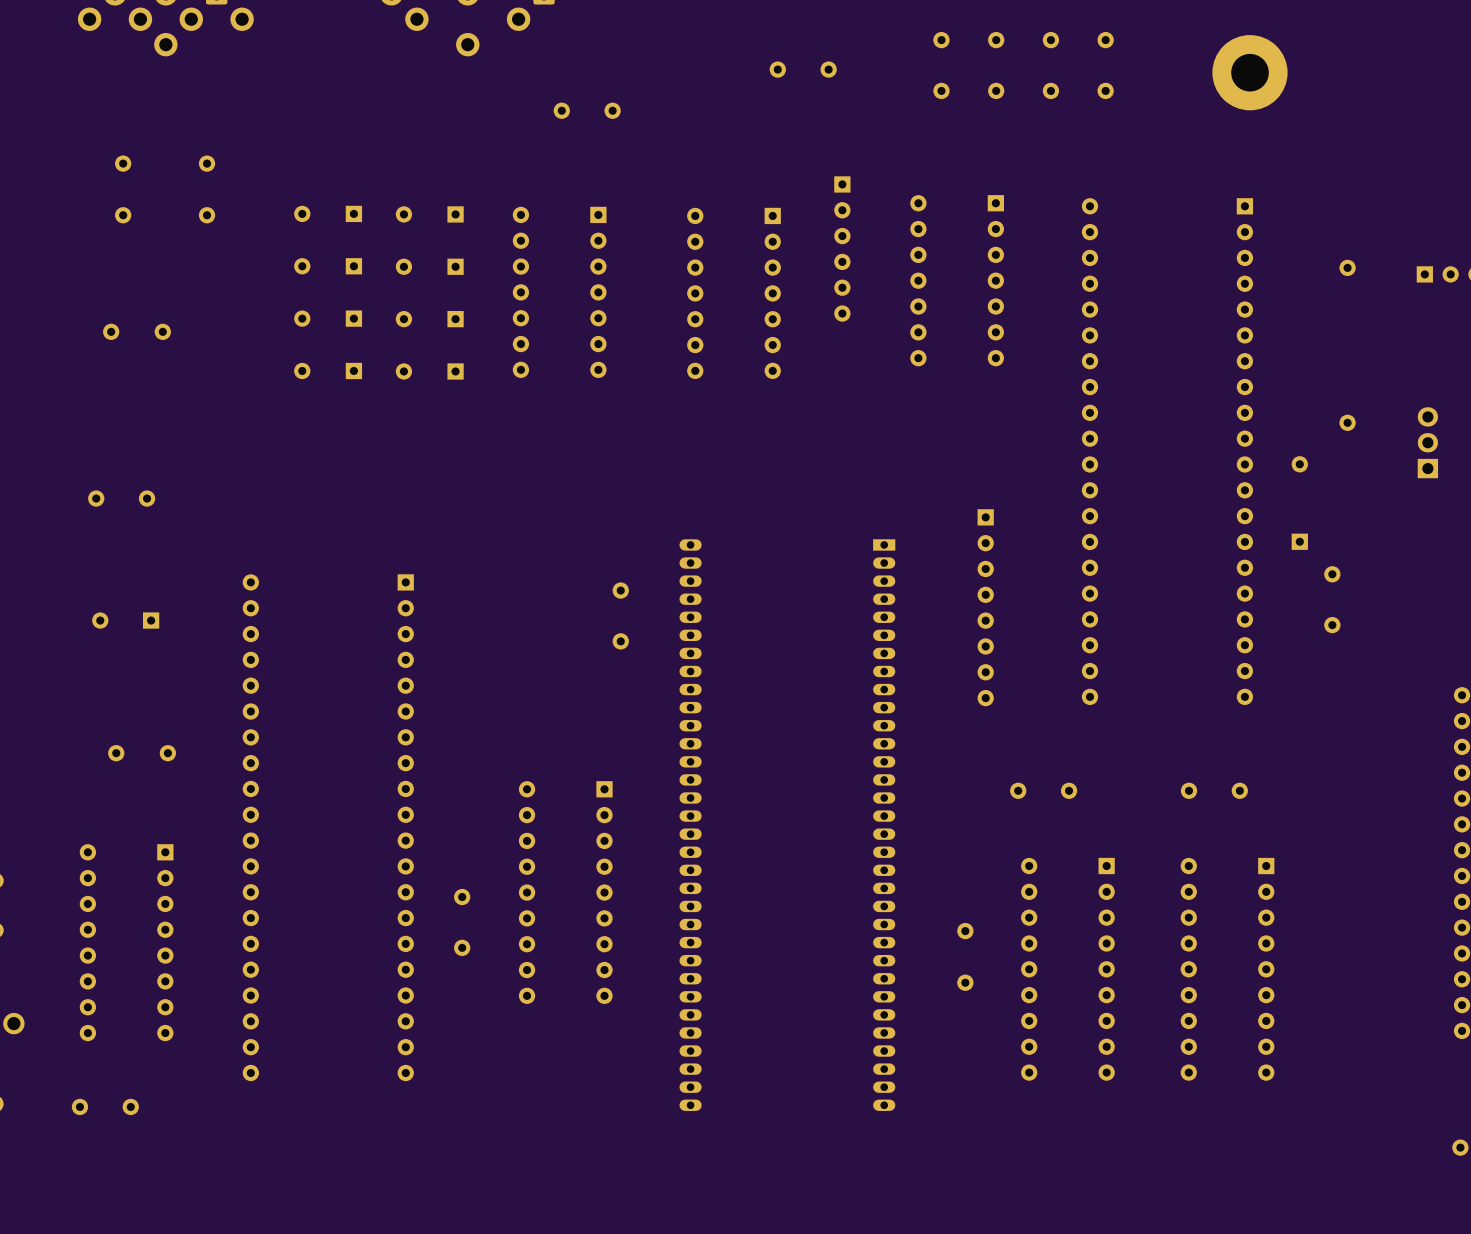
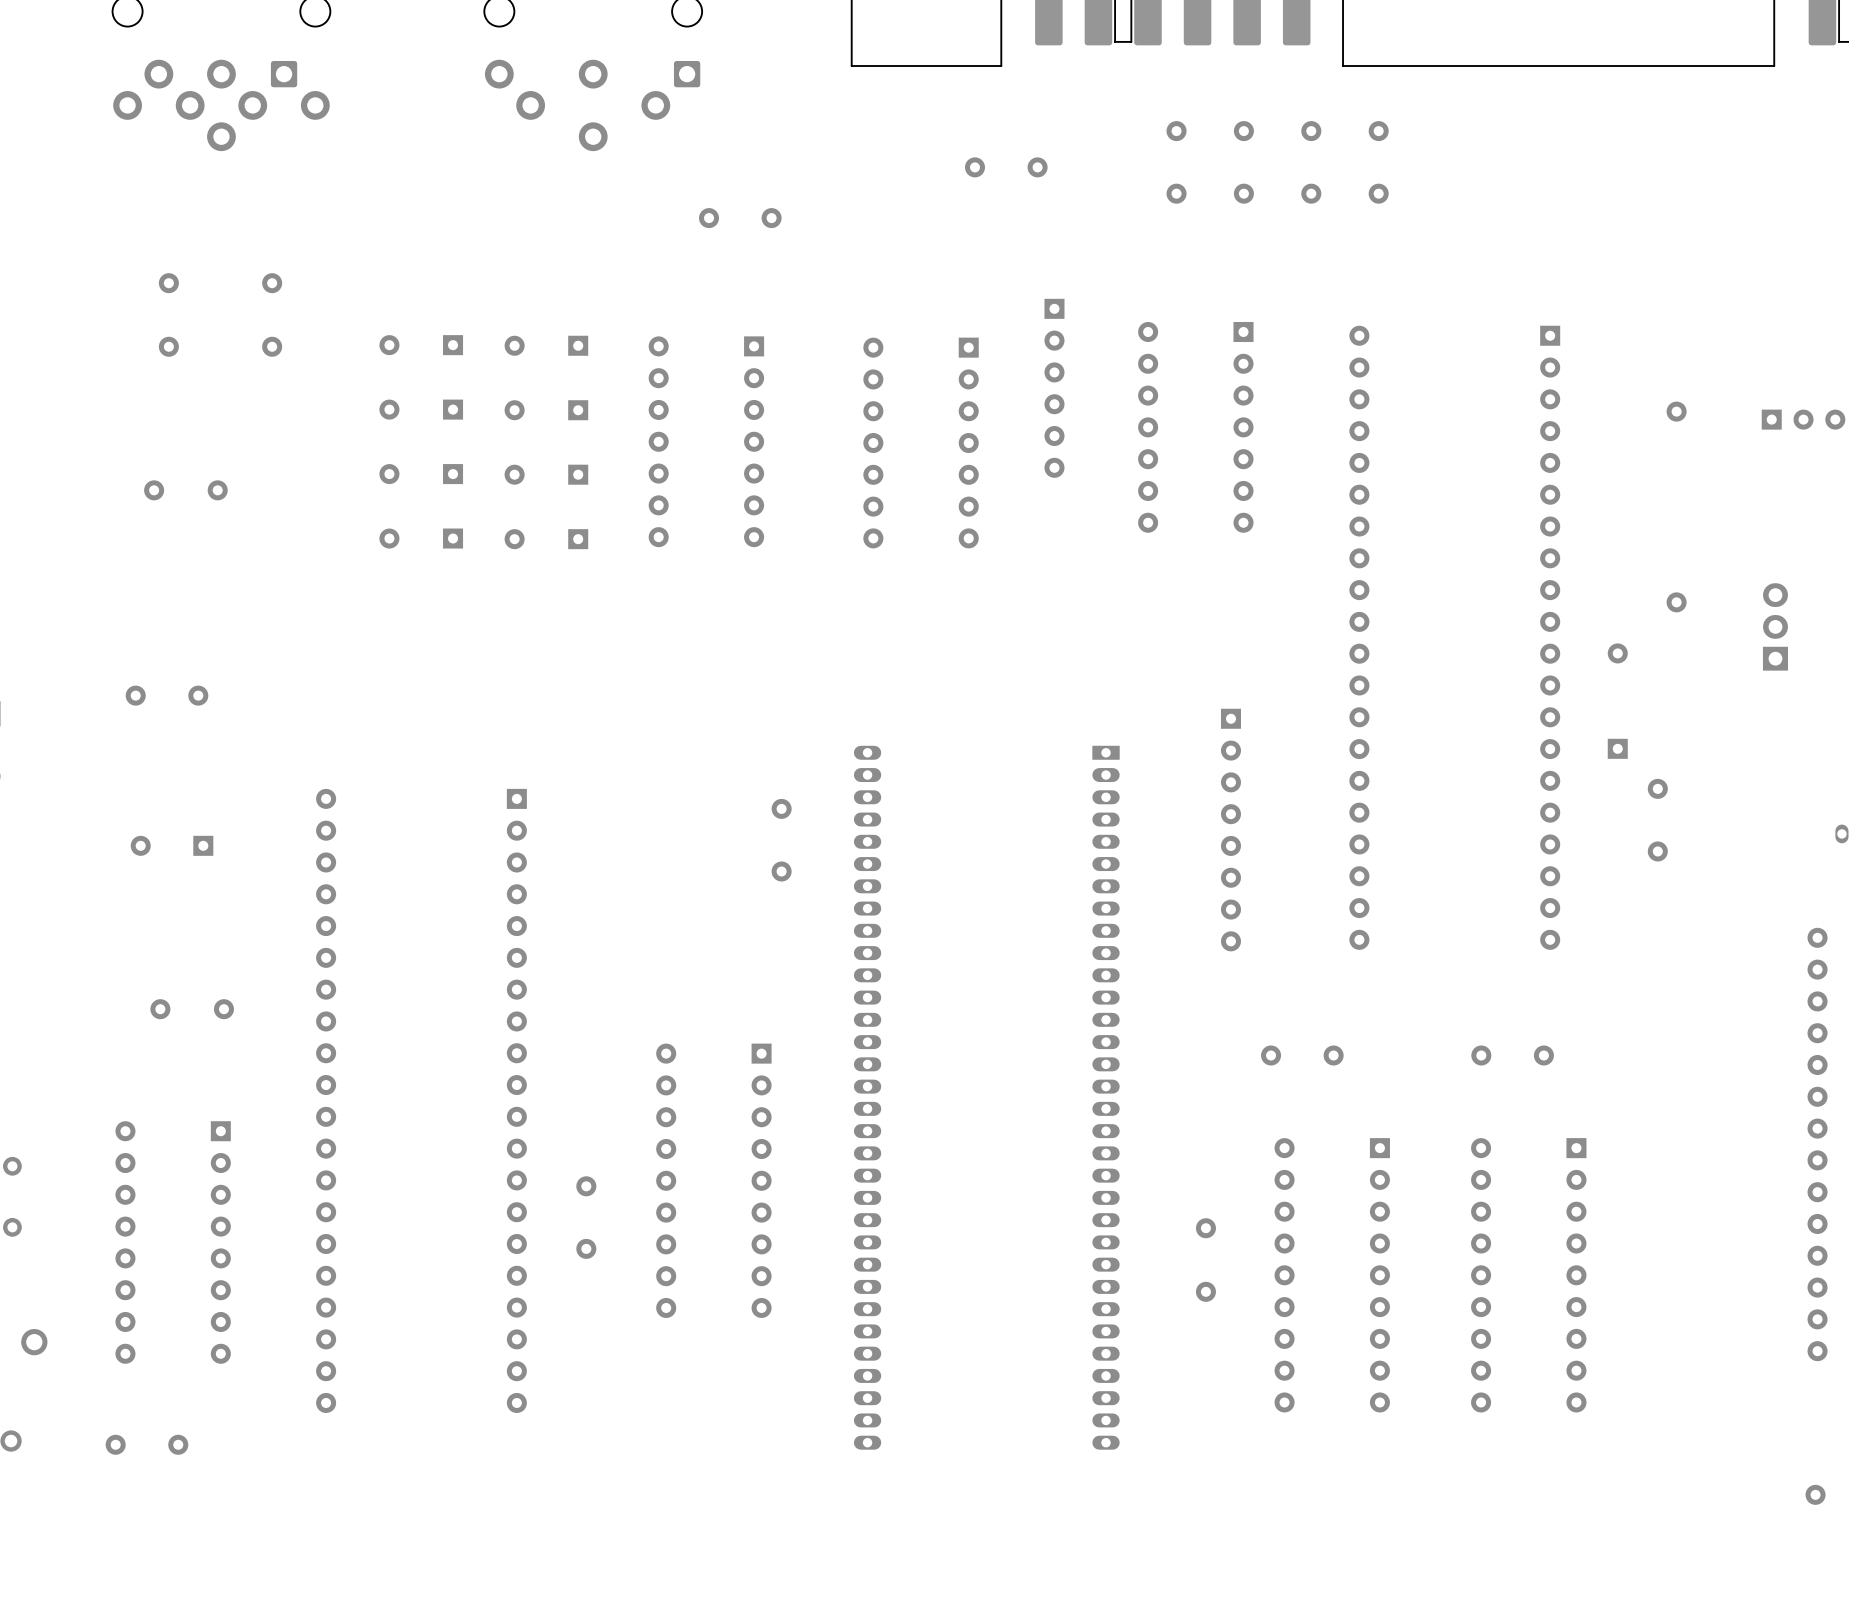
part: (1250, 72) -> none

